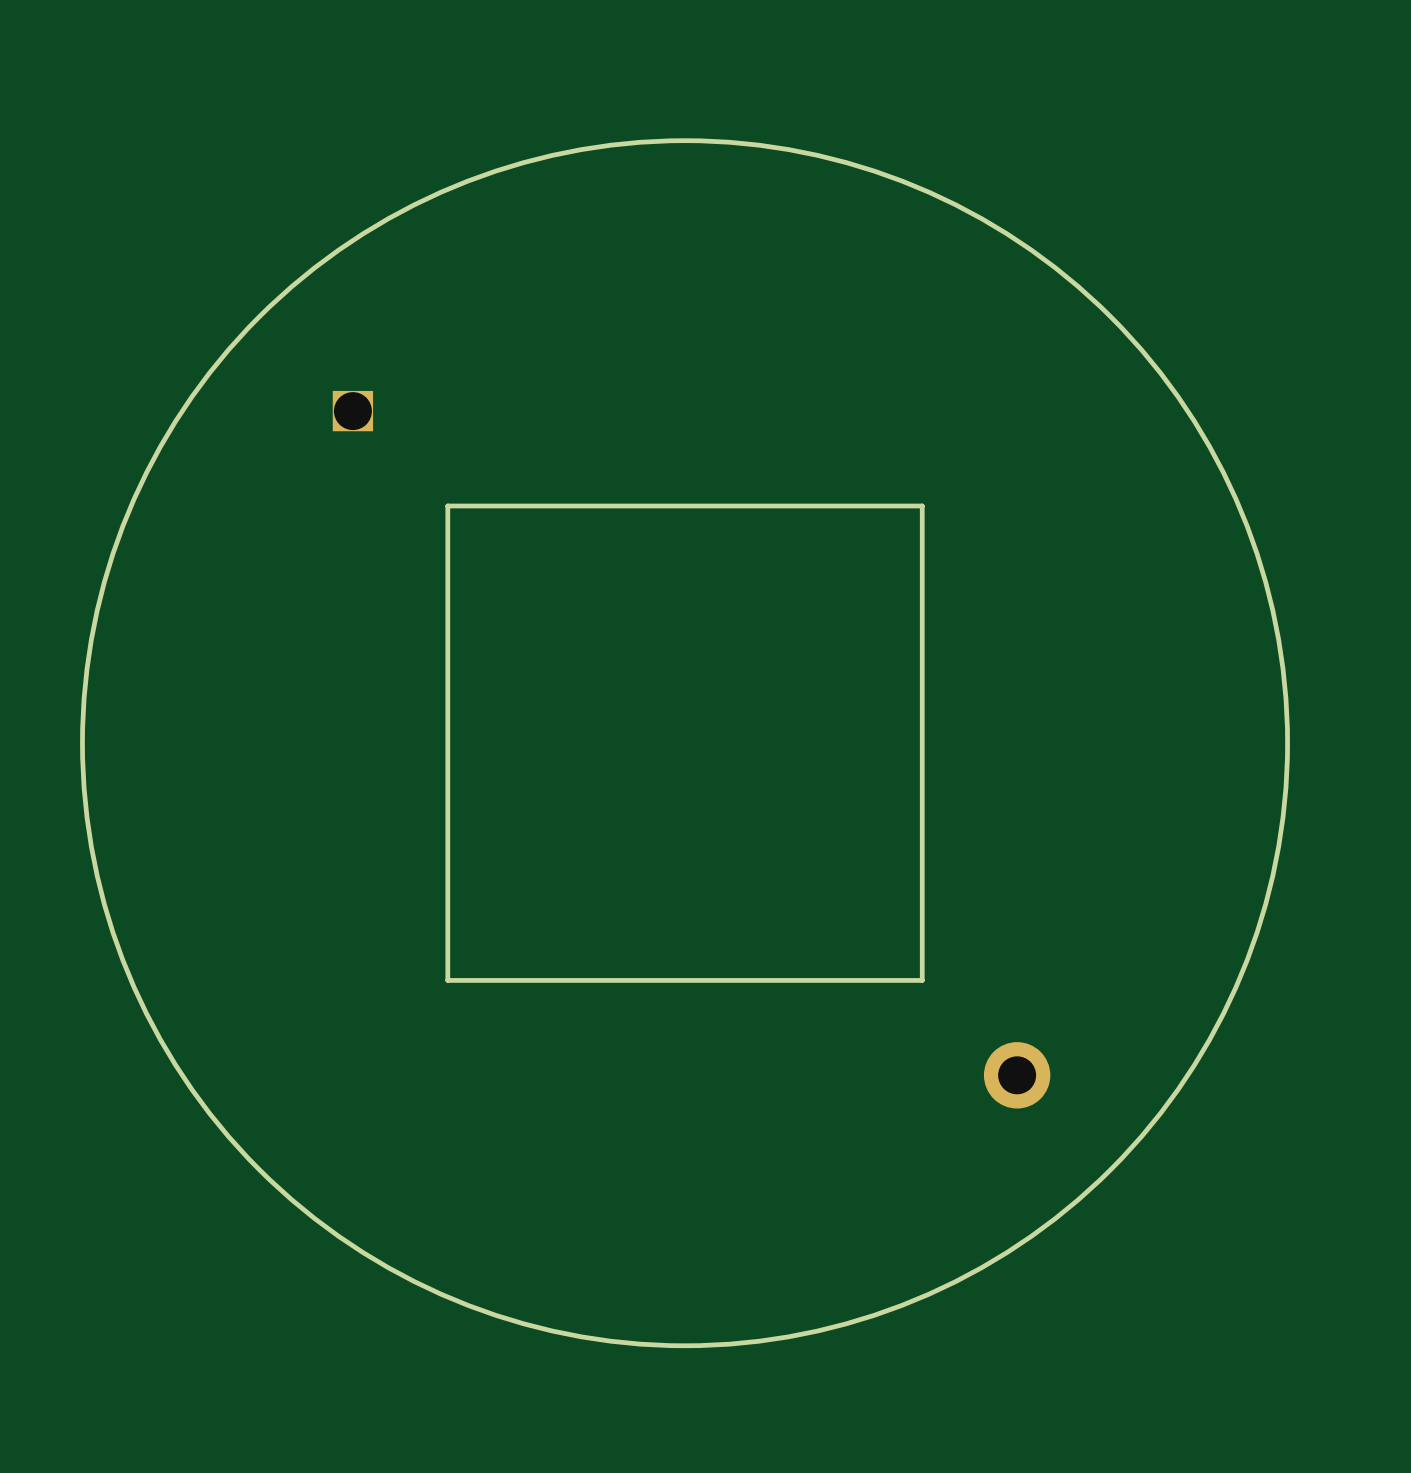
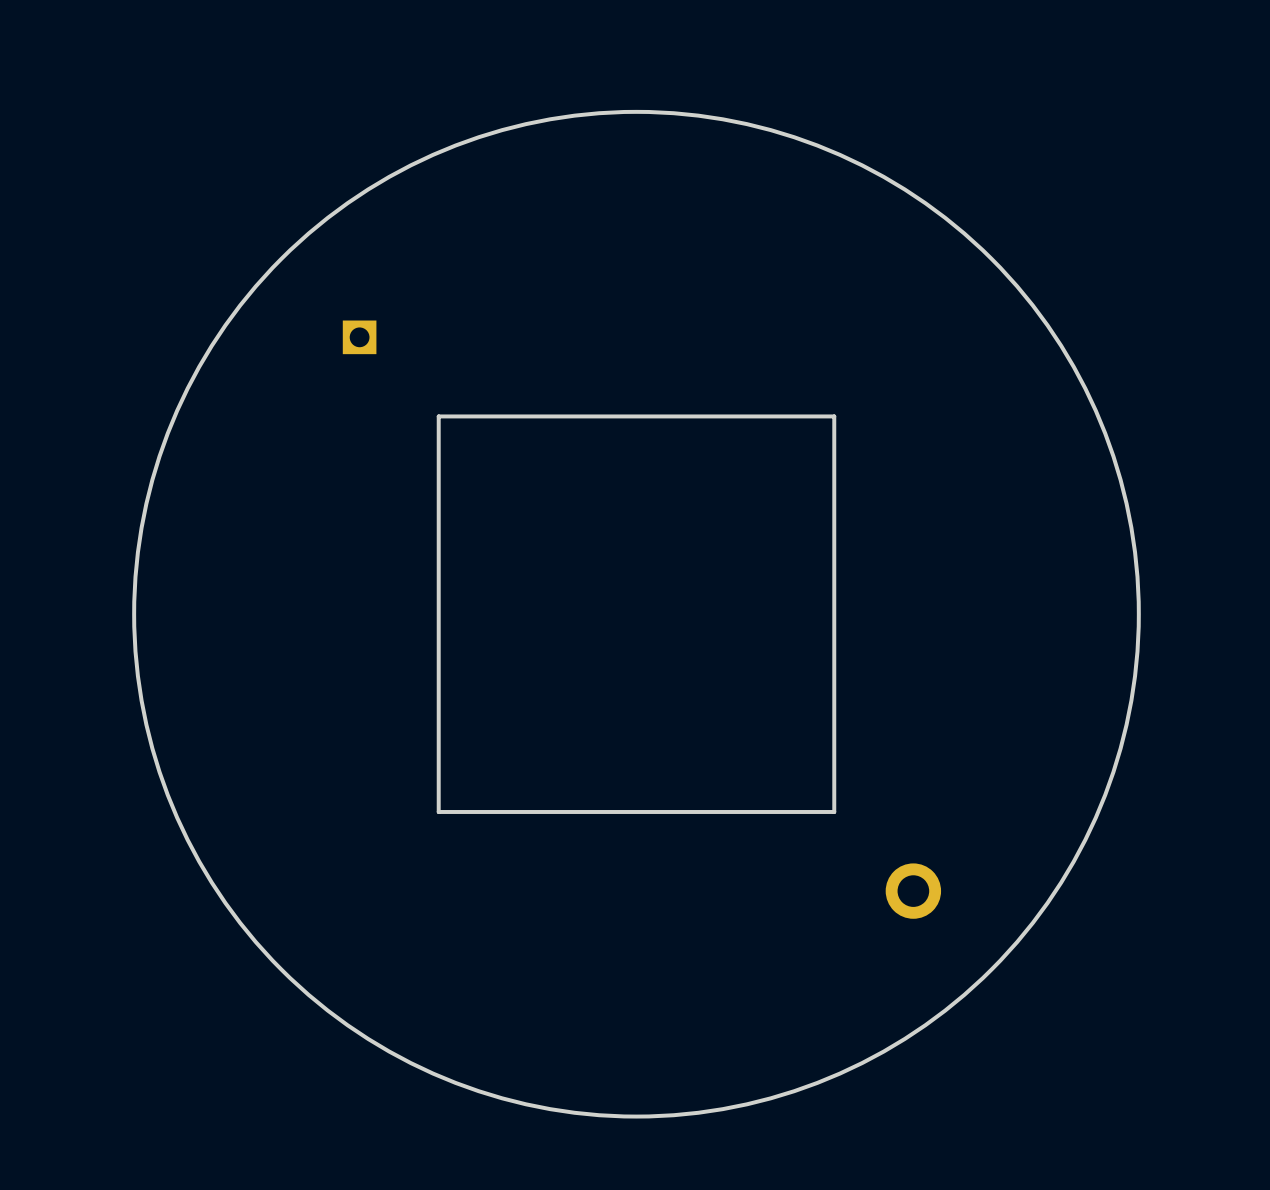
part footprint: [332, 390, 374, 432] -> [342, 320, 377, 355]

